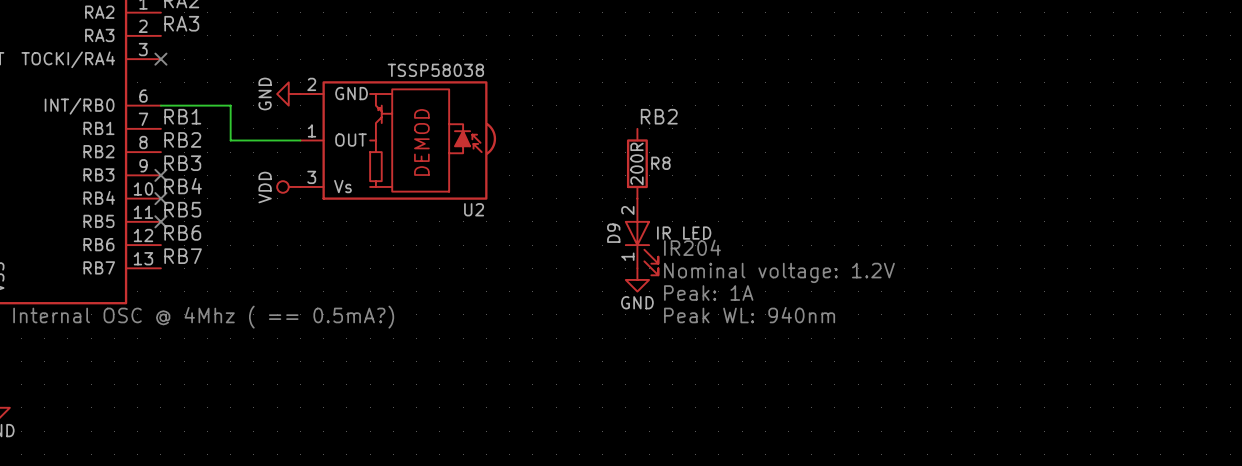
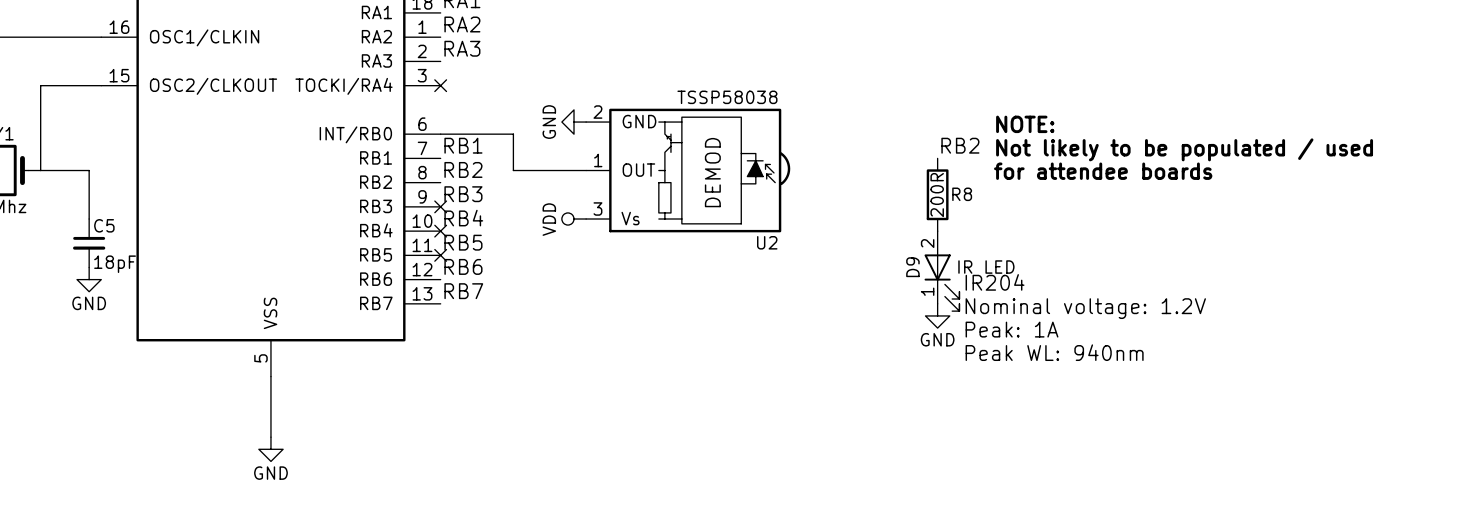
text: none -> NOTE: (1025, 124)
text: none -> Not likely to be populated / used (1184, 149)
text: none -> for attendee boards (1103, 171)
text: Internal OSC @ 4Mhz ( == 0.5mA?) (203, 317) -> none

